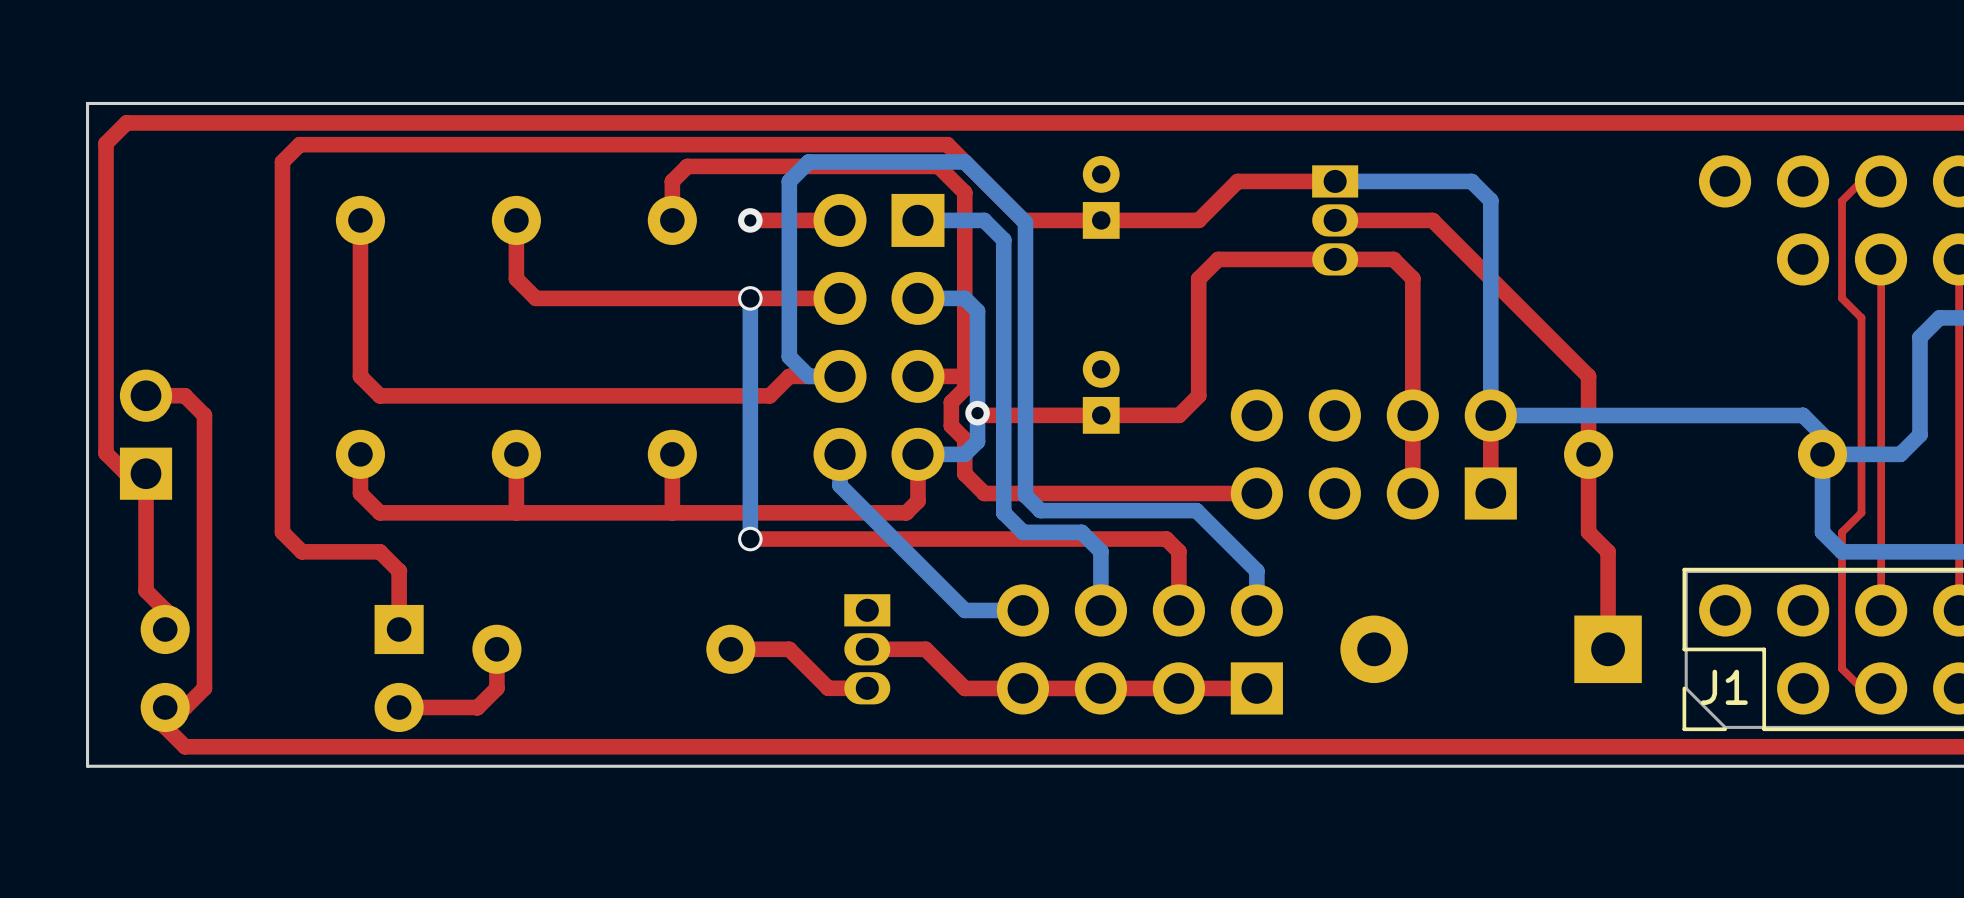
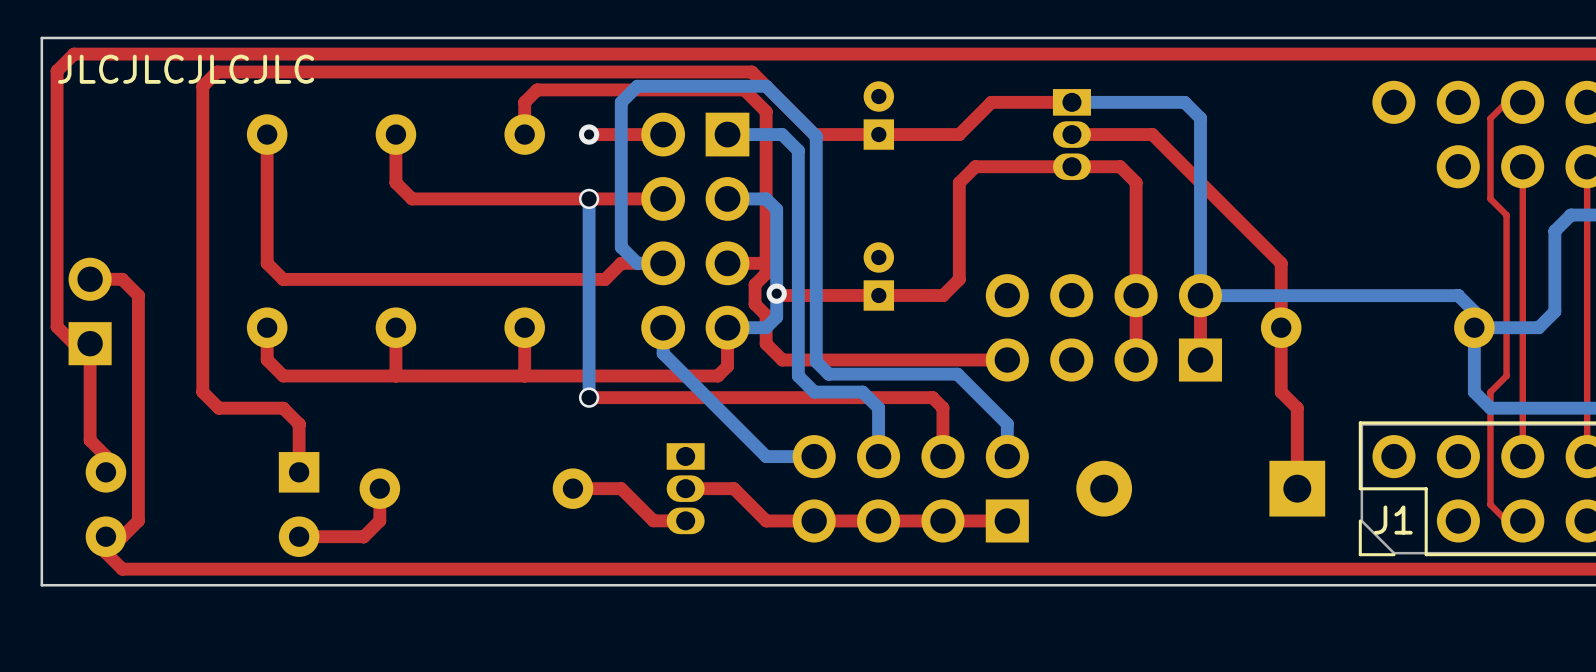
text: none -> JLCJLCJLCJLC (186, 69)

